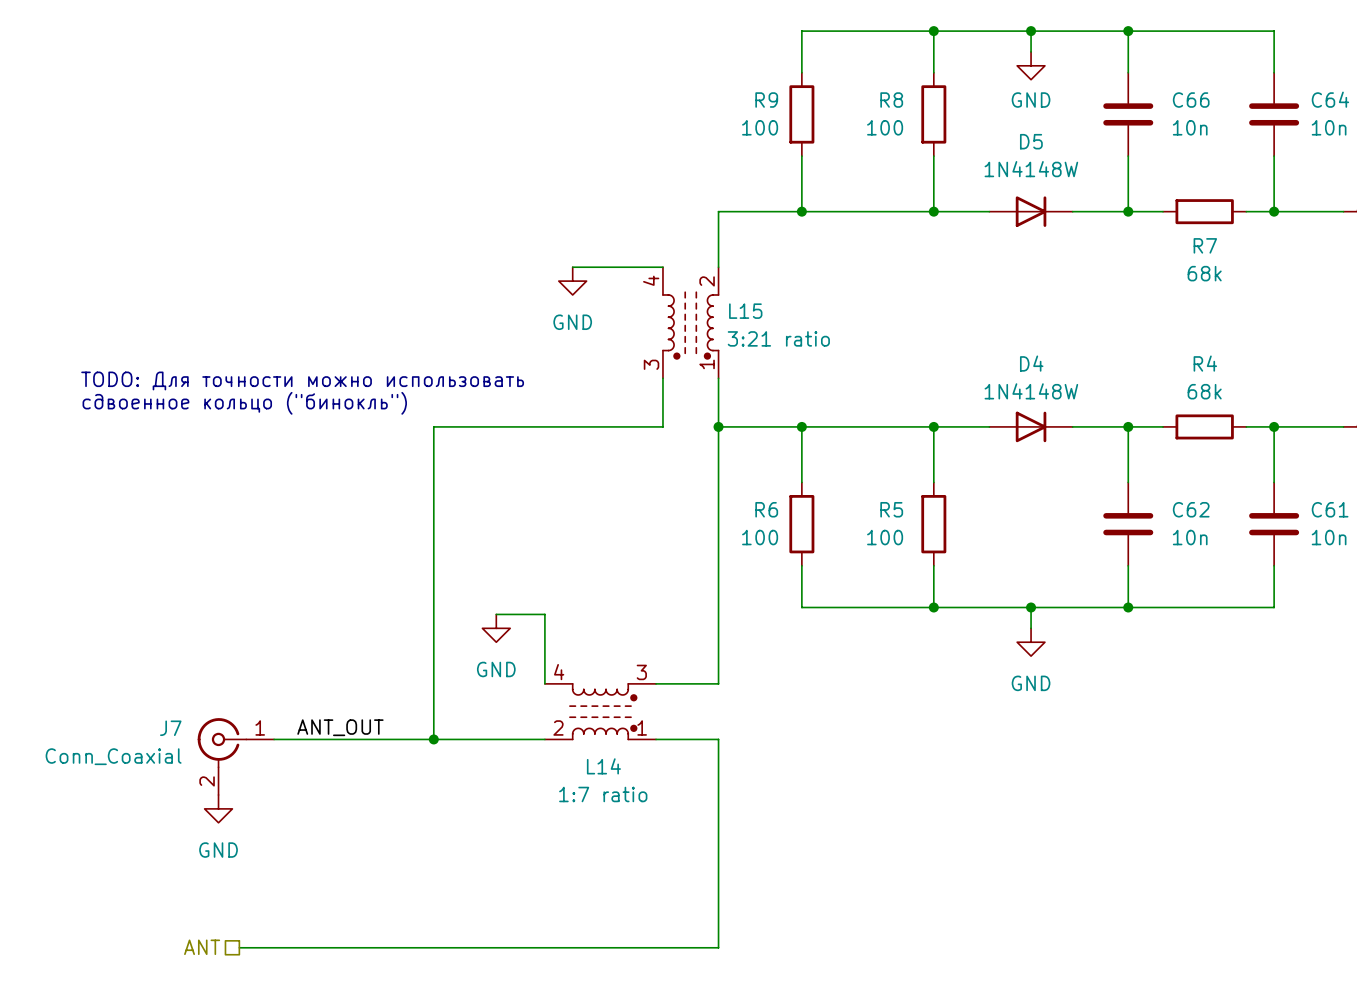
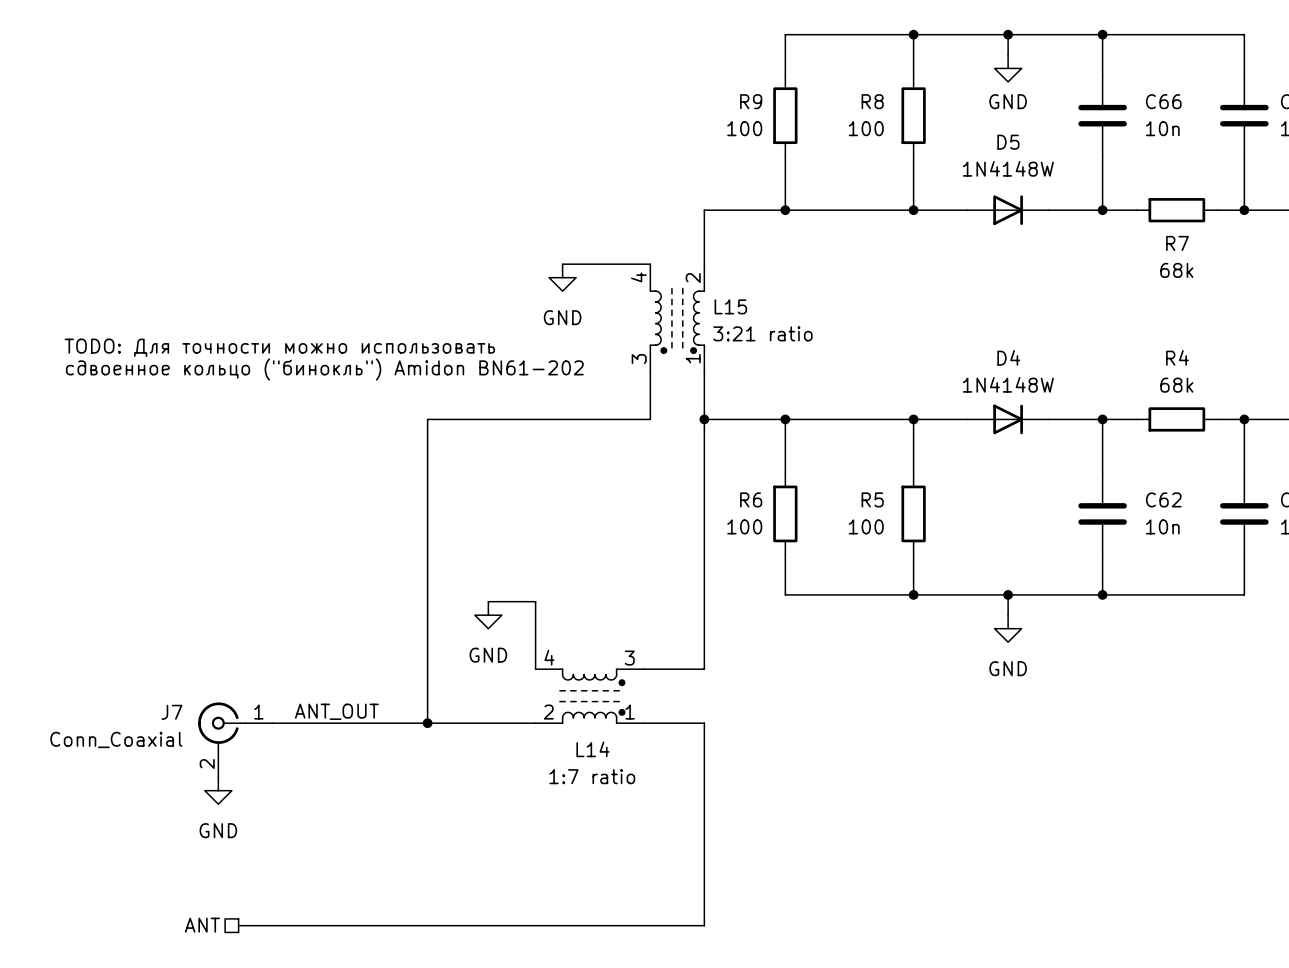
text position: TODO: Для точности можно использовать (302, 380) -> TODO: Для точности можно использовать (279, 347)
text: сдвоенное кольцо ("бинокль") (244, 403) -> сдвоенное кольцо ("бинокль") Amidon BN61-202 (324, 369)

